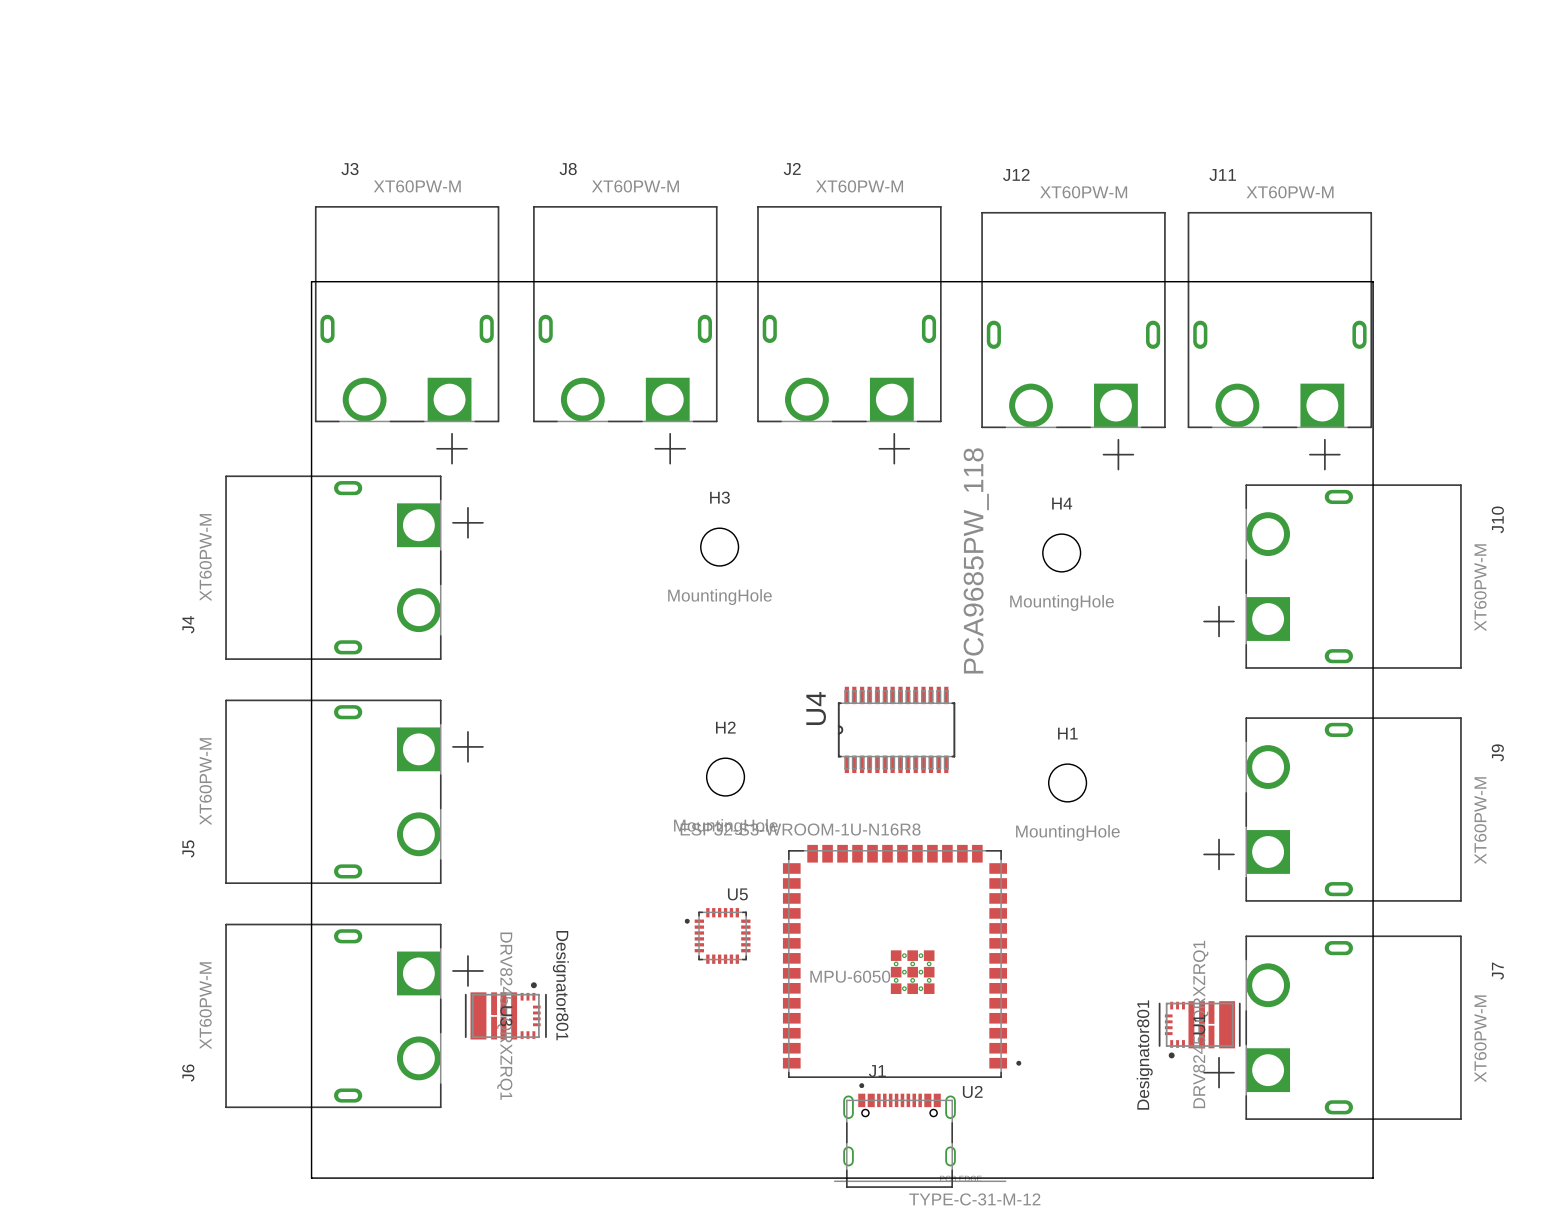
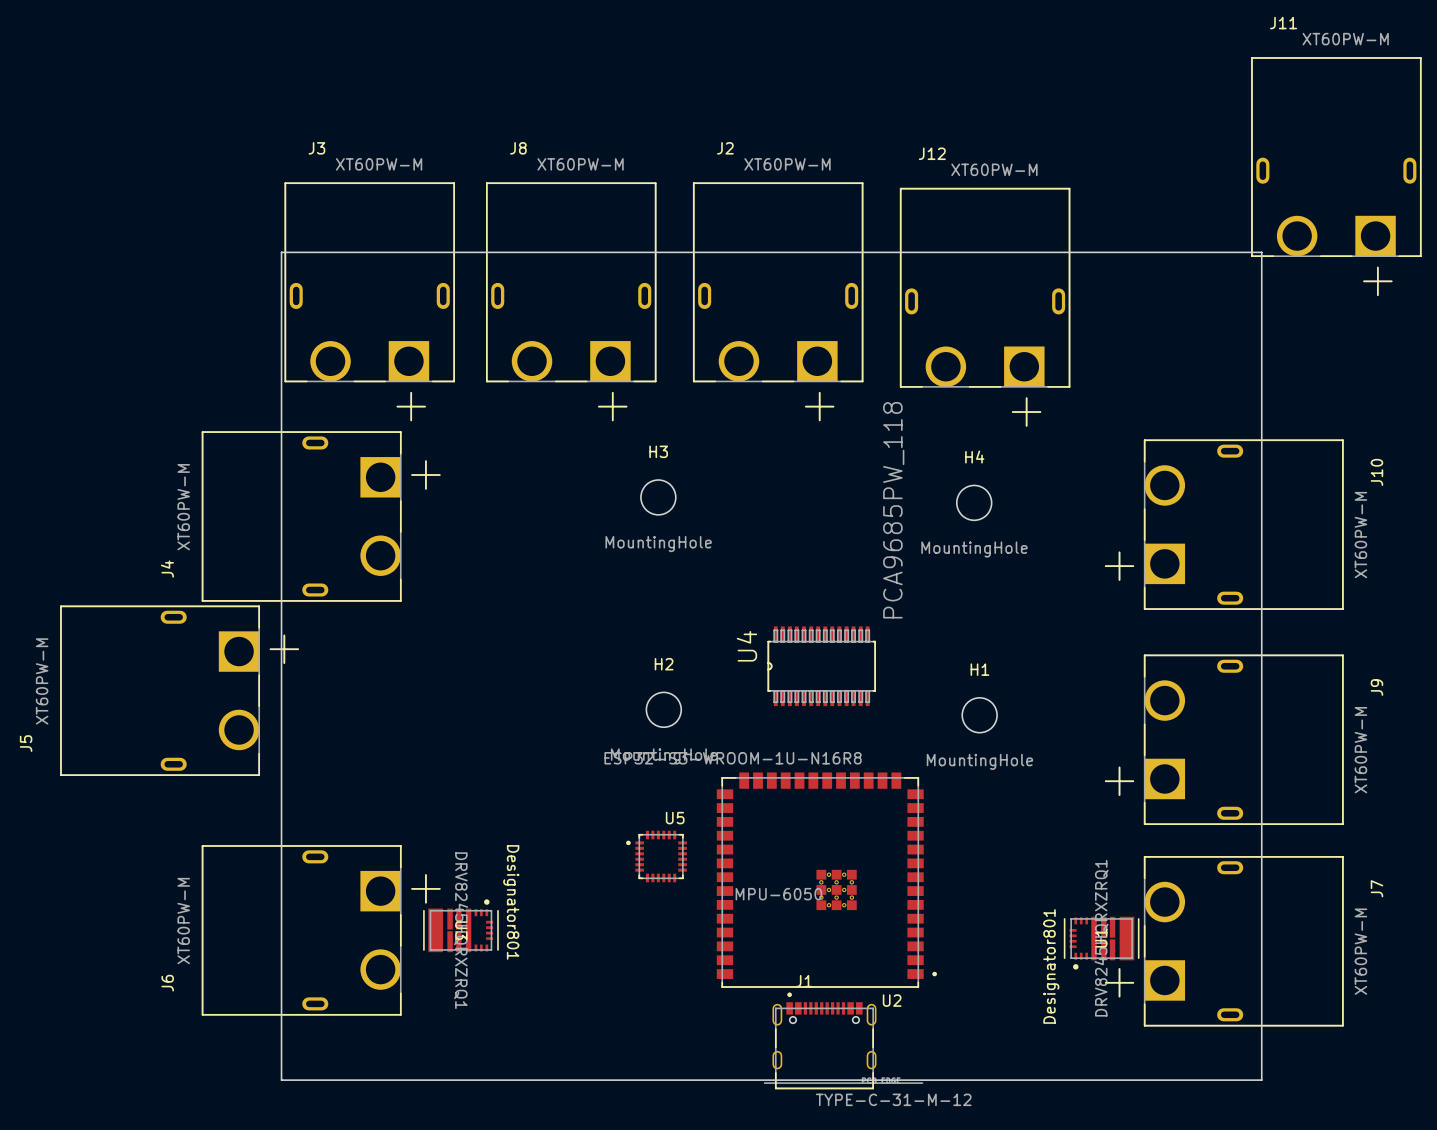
J11 position: (1279, 341) -> (1336, 176)
J5 position: (354, 791) -> (179, 690)

